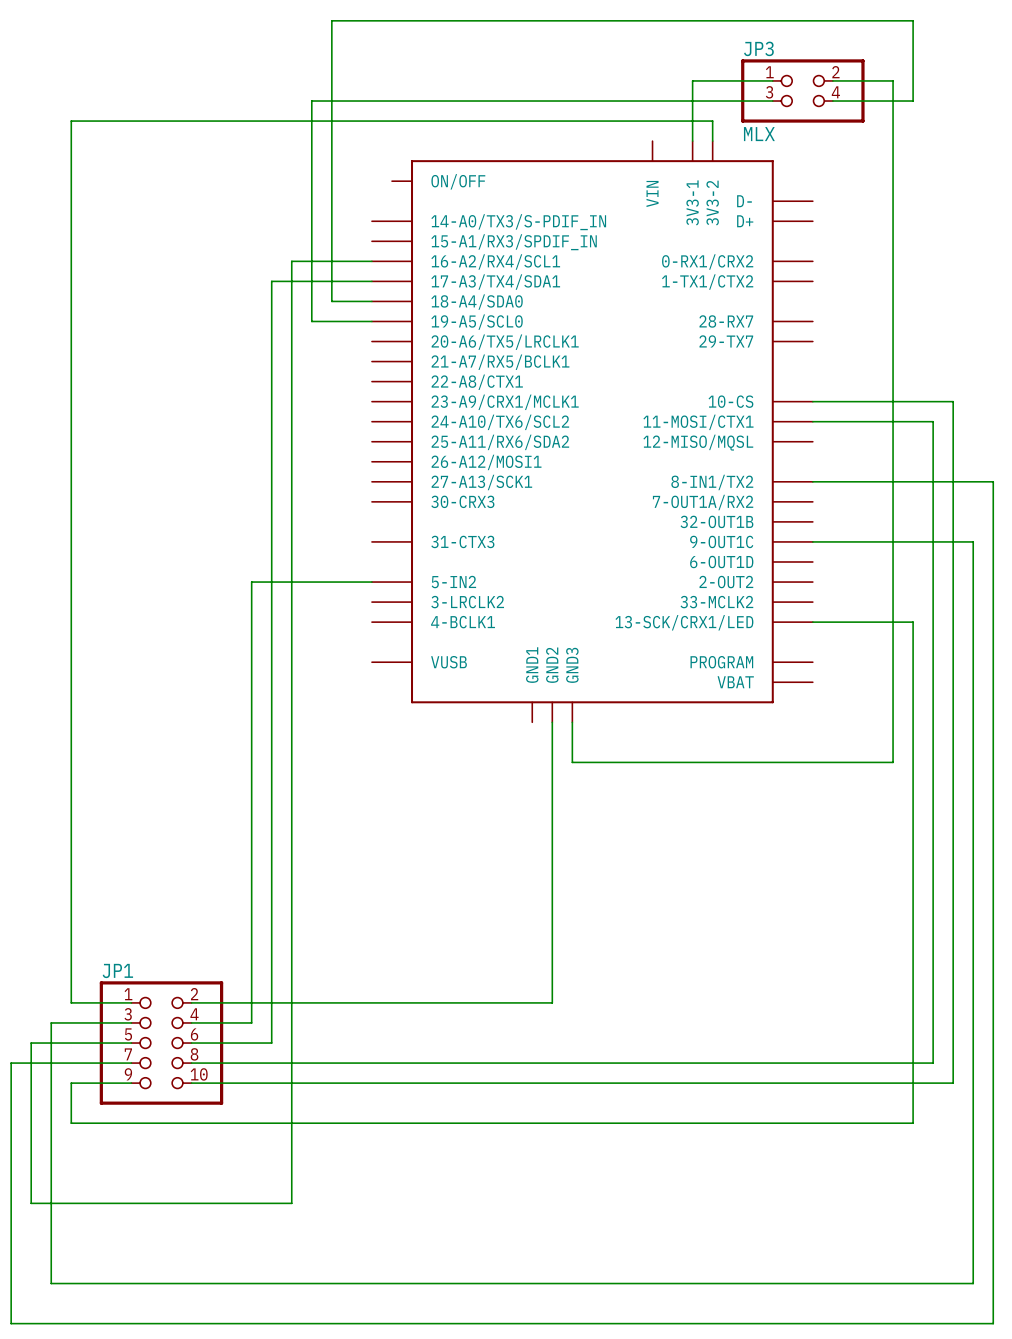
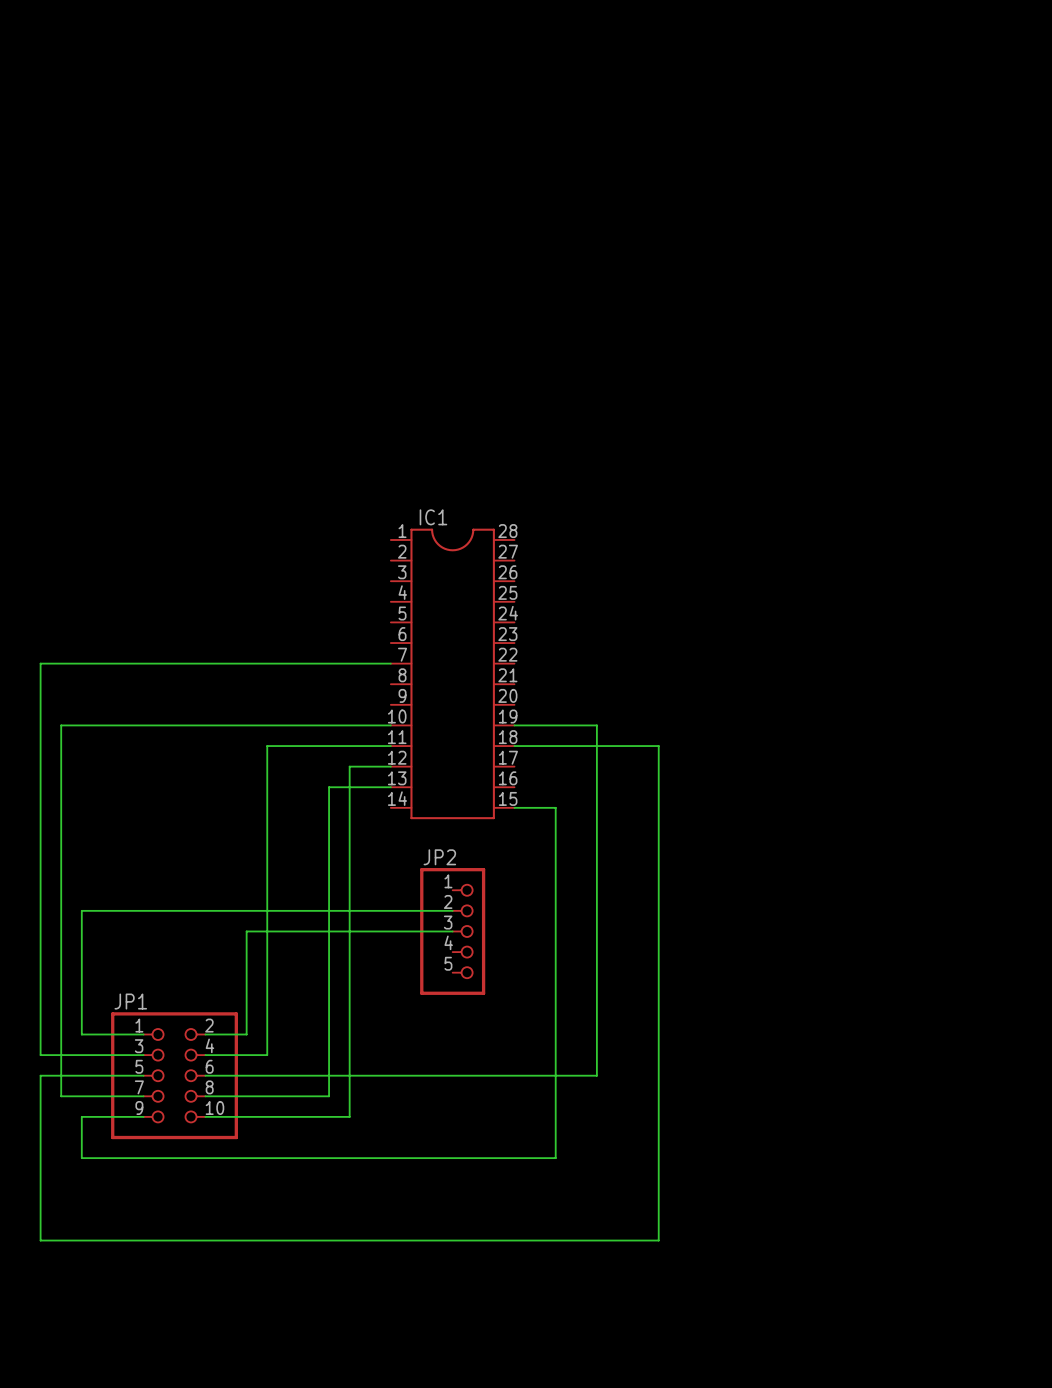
wire: (772, 80) (692, 80) (692, 141) -> none
wire: (832, 80) (893, 80) (893, 762) (572, 762) -> none
JP3: MLX (802, 90) -> none
wire: (772, 101) (311, 101) (311, 321) (371, 321) -> none
wire: (832, 101) (913, 101) (913, 20) (331, 20) (331, 301) (371, 301) -> none
wire: (712, 141) (712, 121) (71, 121) (71, 882) -> (452, 910) (81, 910)
wire: (371, 261) (291, 261) (291, 1203) -> (514, 746) (658, 746) (658, 1240) (308, 1240)
wire: (371, 281) (271, 281) (271, 1043) -> (596, 787) (596, 1075) (287, 1075)
wire: (812, 401) (953, 401) (953, 1083) (331, 1083) -> (390, 766) (349, 766) (349, 1116)
wire: (812, 421) (933, 421) (933, 1063) (311, 1063) -> (390, 787) (329, 787) (329, 1096)
part: (592, 431) -> none
wire: (812, 481) (993, 481) (993, 1323) (11, 1323) (11, 1063) (51, 1063) (51, 1283) (973, 1283) (973, 541) (812, 541) -> none
wire: (371, 582) (251, 582) (251, 722) -> (390, 746) (267, 746)
wire: (812, 622) (913, 622) (913, 1123) (532, 1123) -> (514, 807) (555, 807) (555, 1158)
wire: none -> (390, 663) (40, 663) (40, 1055) (61, 1055) (61, 725) (390, 725)
IC1: none -> (452, 673)
wire: (552, 722) (552, 1002) (231, 1002) -> (452, 931) (246, 931) (246, 1034)
JP2: none -> (452, 931)

